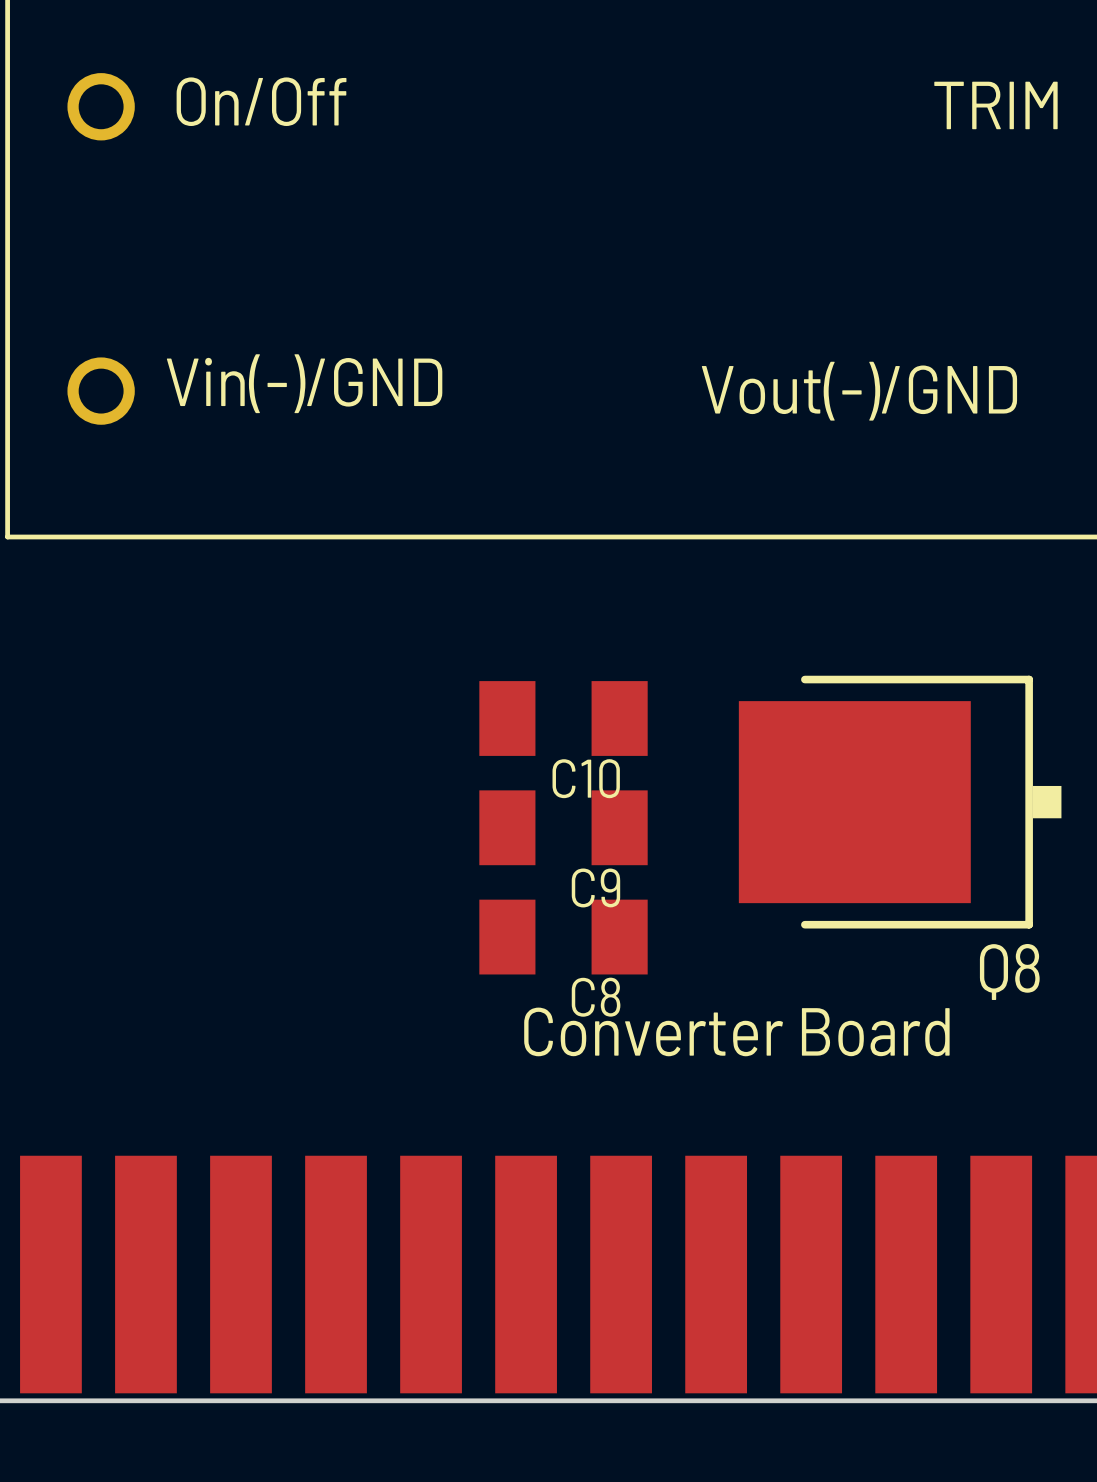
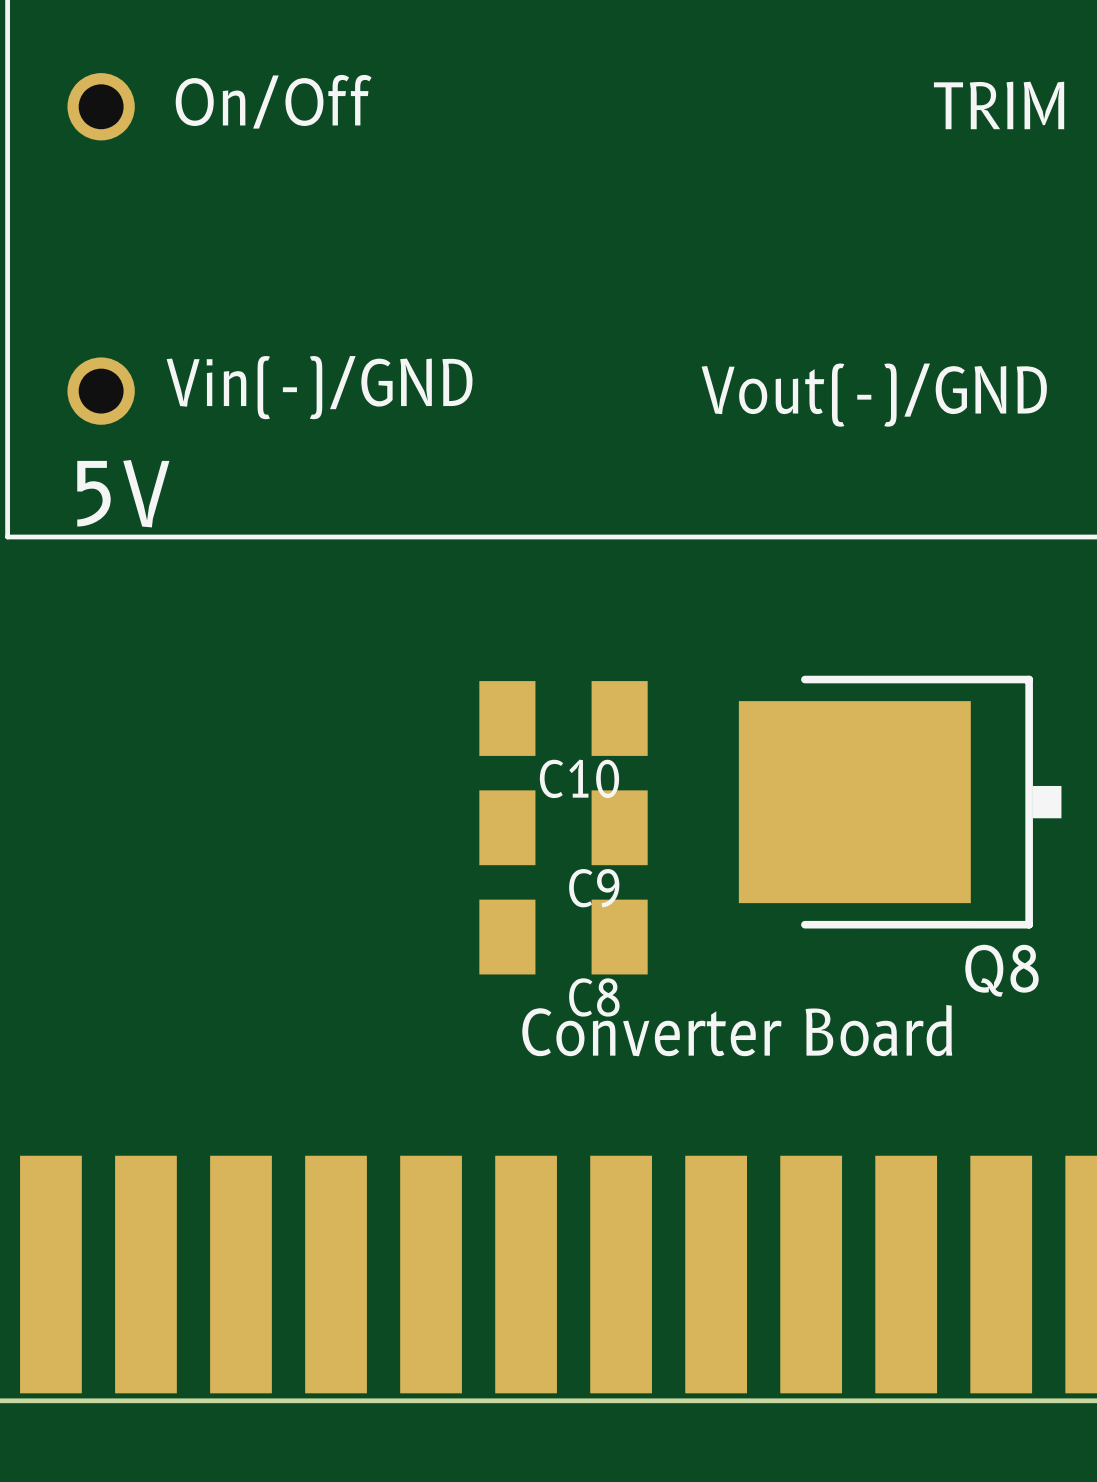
text: none -> 5V (123, 493)

